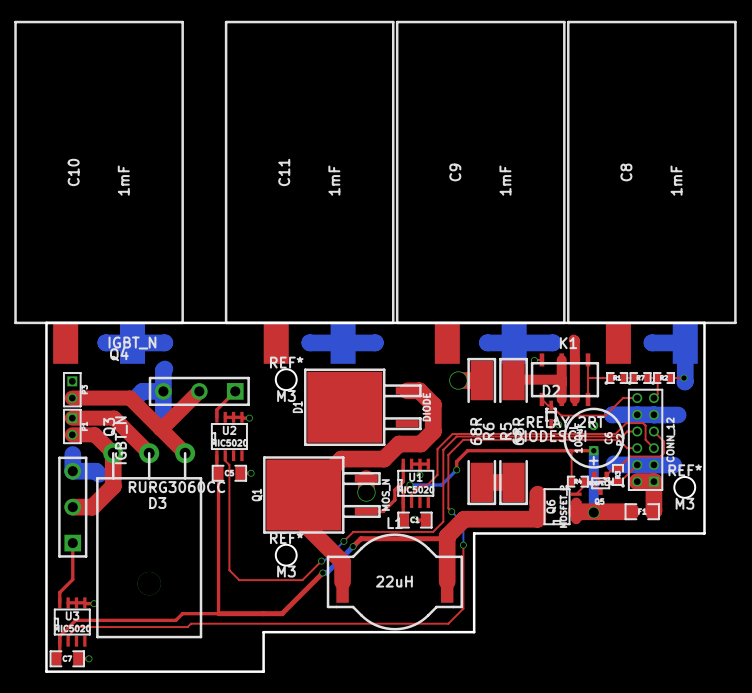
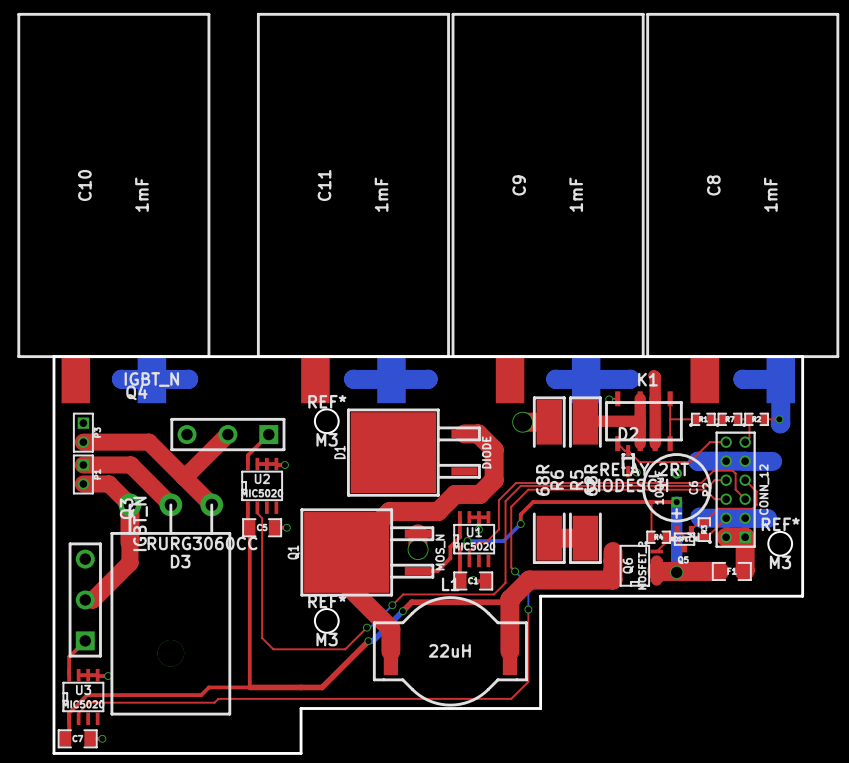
bottom track: (164, 368) (163, 370) (164, 415) -> none
bottom track: (163, 391) (142, 391) (138, 395) -> none
bottom track: (72, 454) (72, 471) (96, 471) (99, 474) -> none
top track: (113, 486) (92, 507) (72, 507) -> (129, 542) (129, 562) (92, 599) (85, 599)
Q3 position: (72, 507) -> (85, 599)
top track: (72, 543) (72, 579) (59, 592) -> (85, 640) (69, 657) (69, 663)

